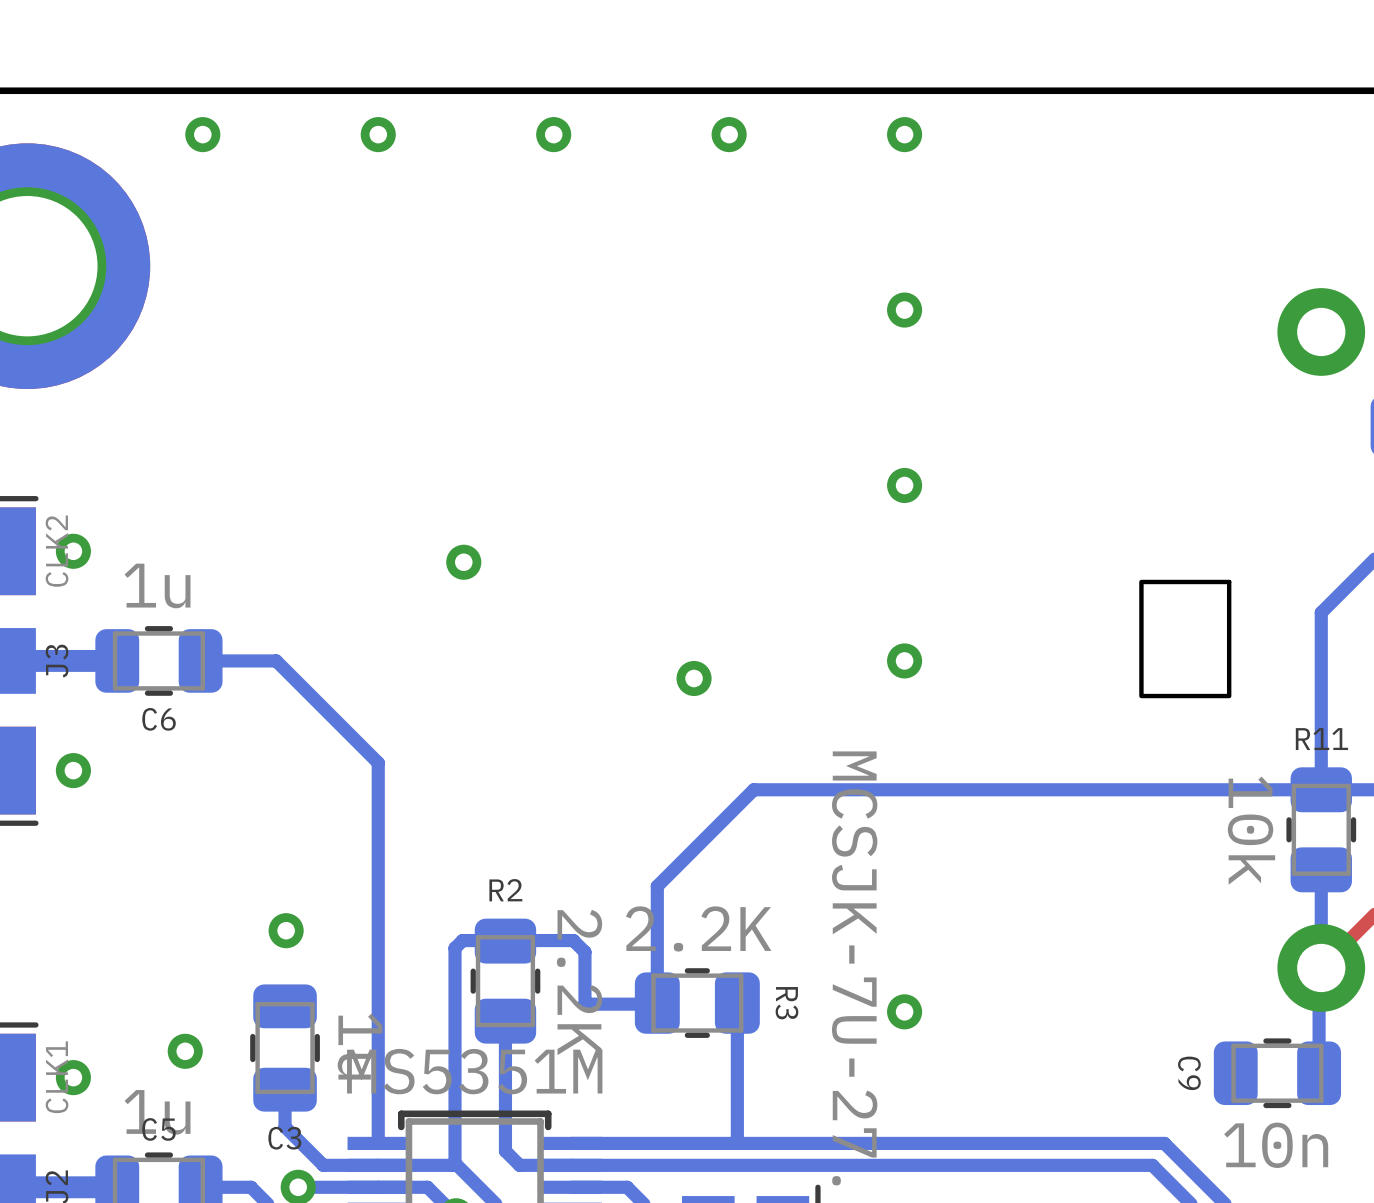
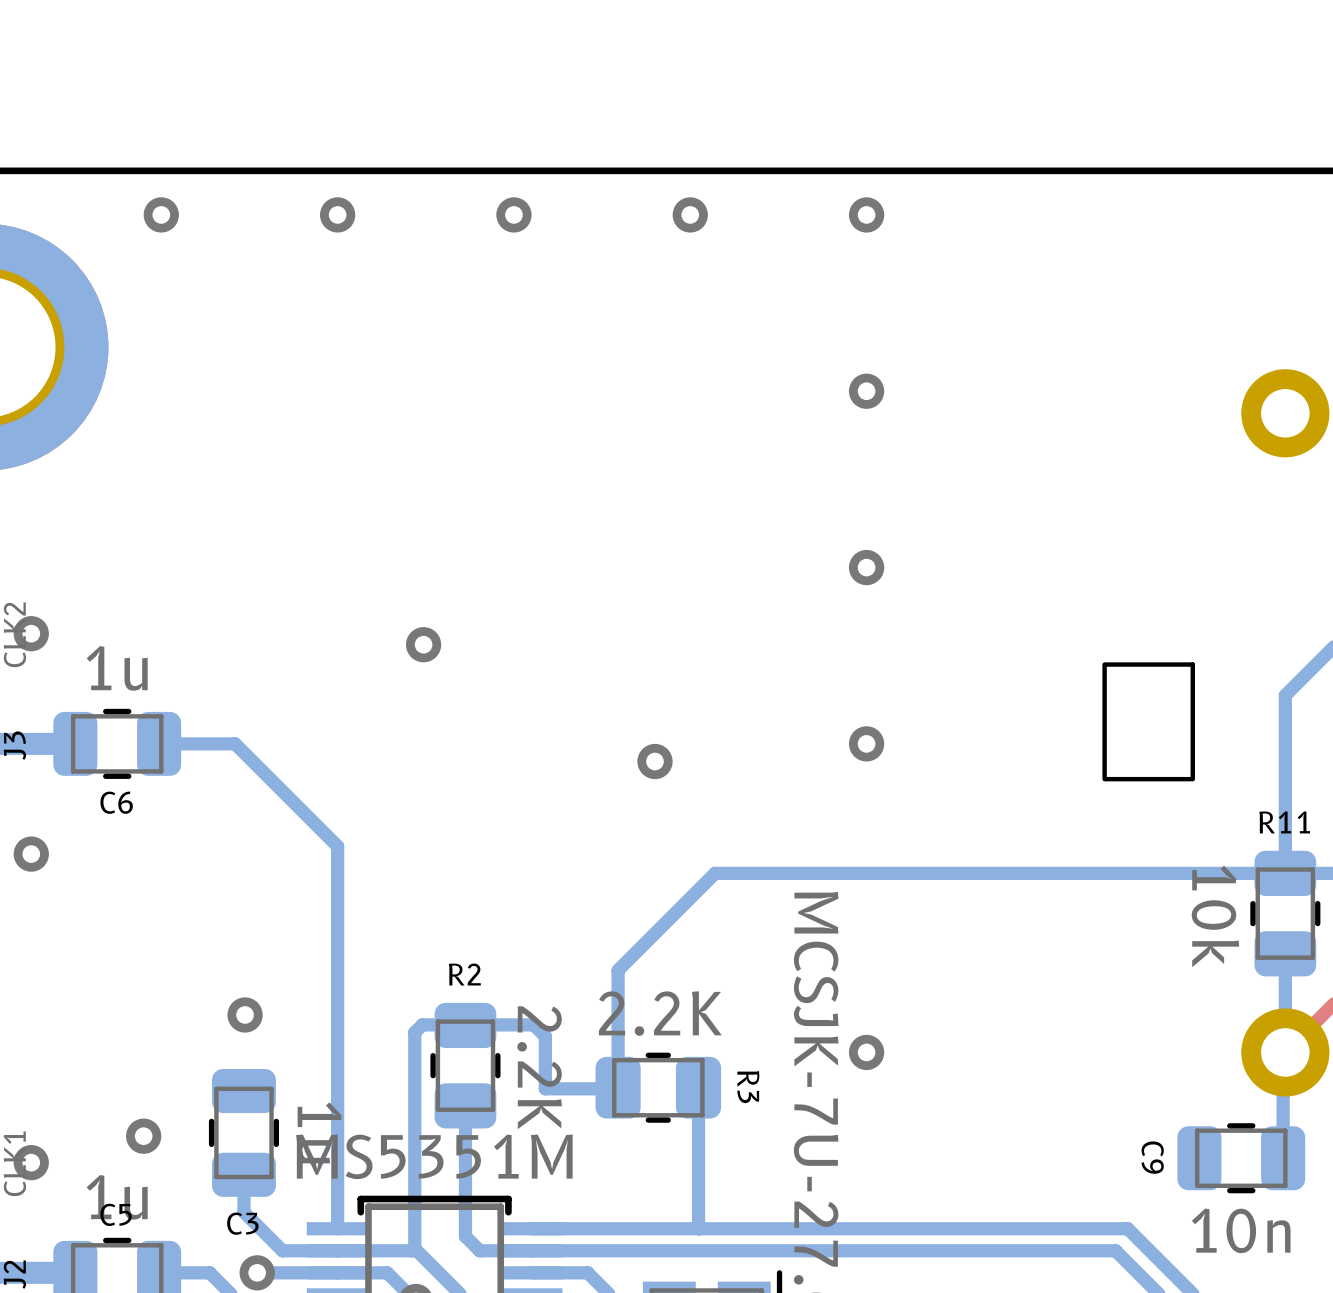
via position: (904, 1011) -> (866, 1052)

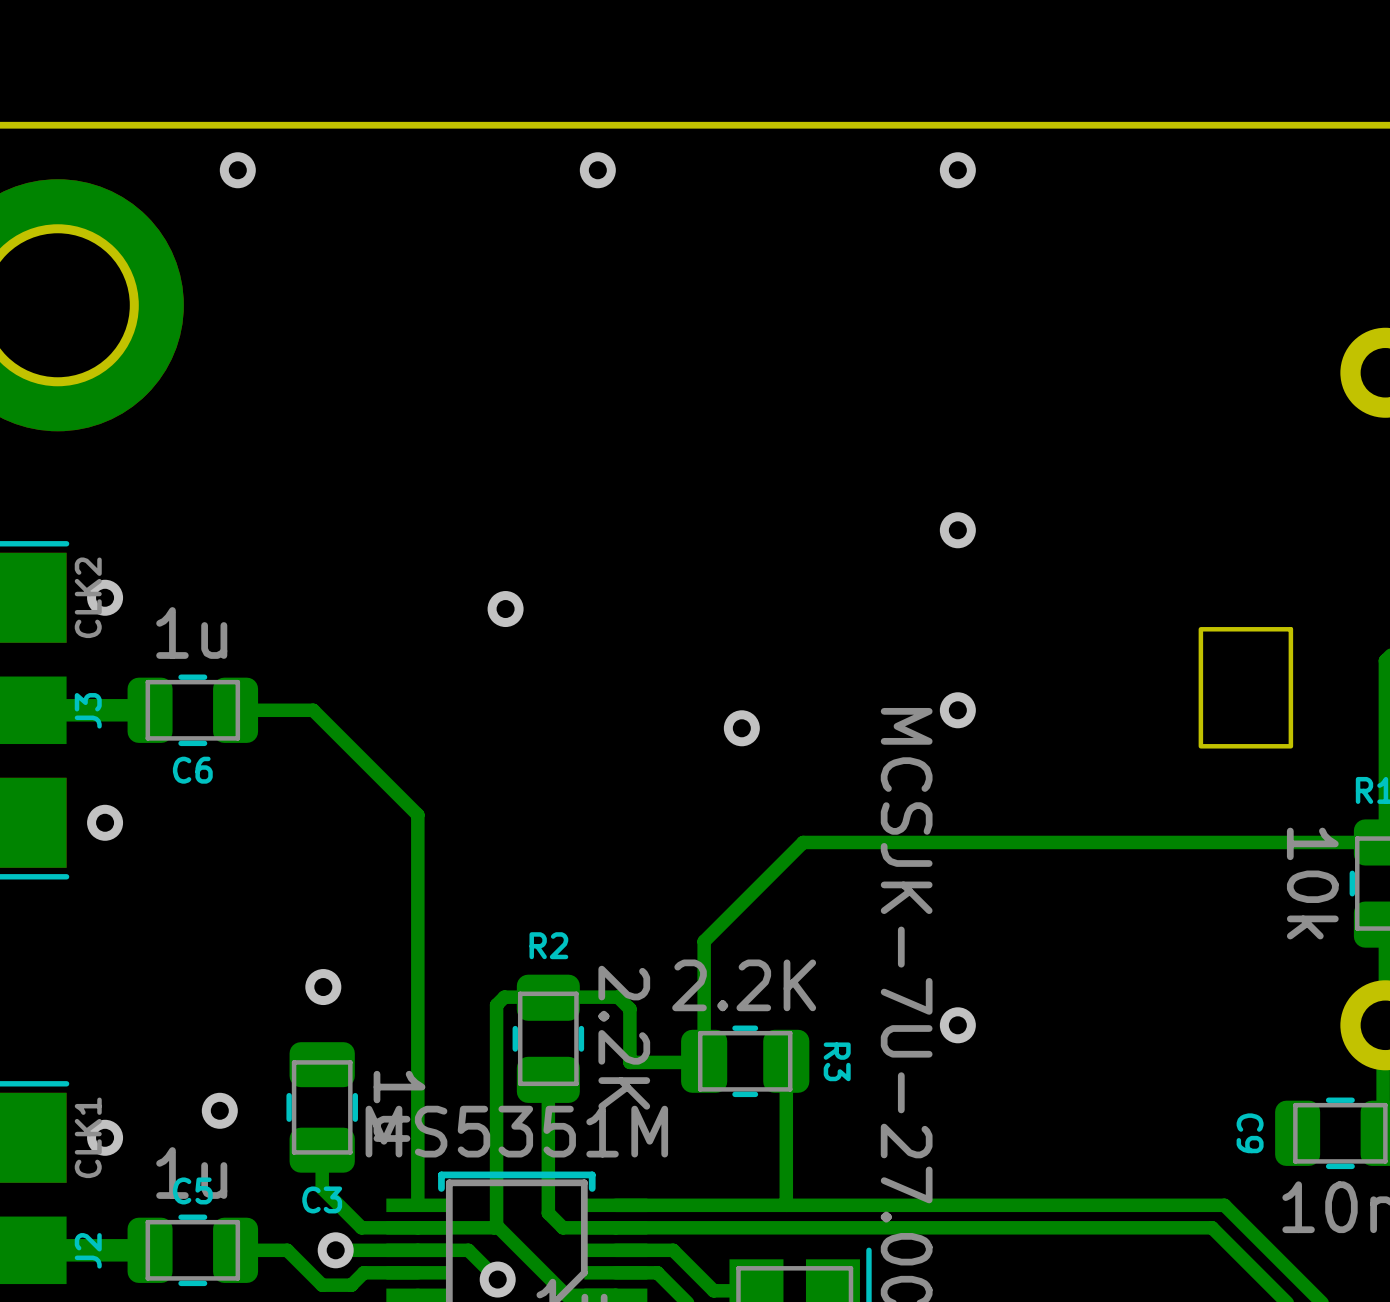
via: (337, 214) -> none
via: (690, 214) -> none
via: (866, 391) -> none

